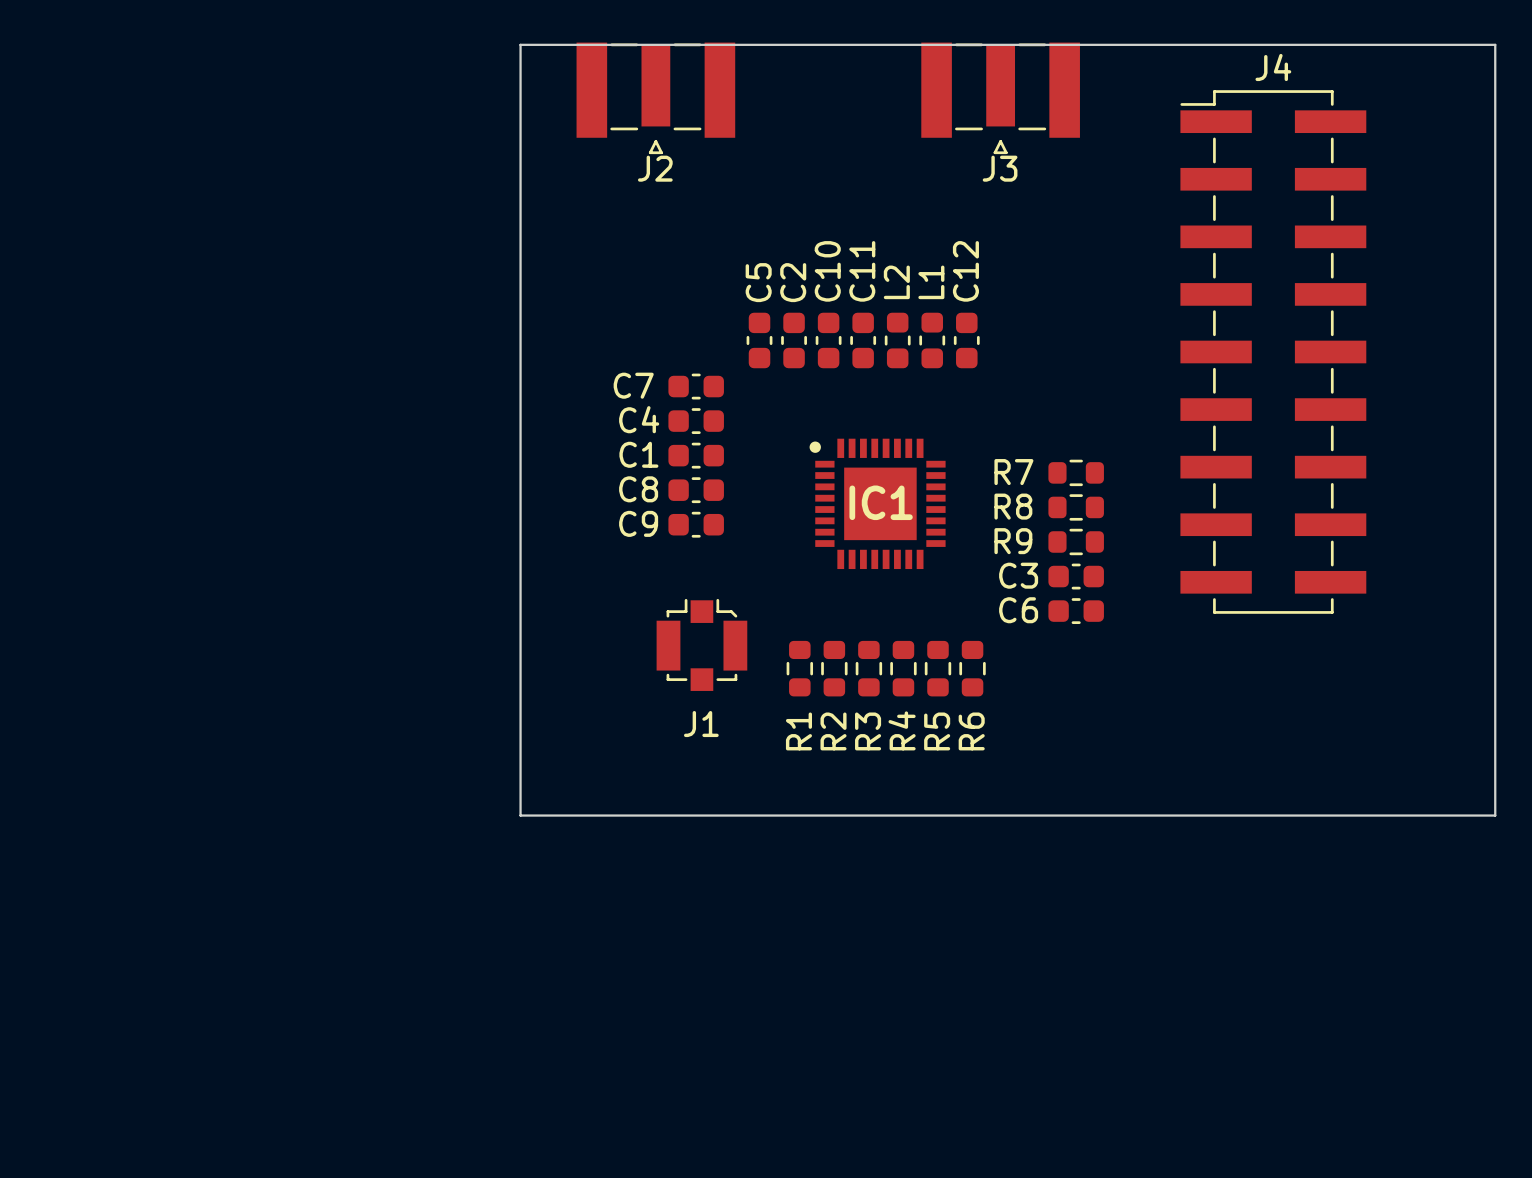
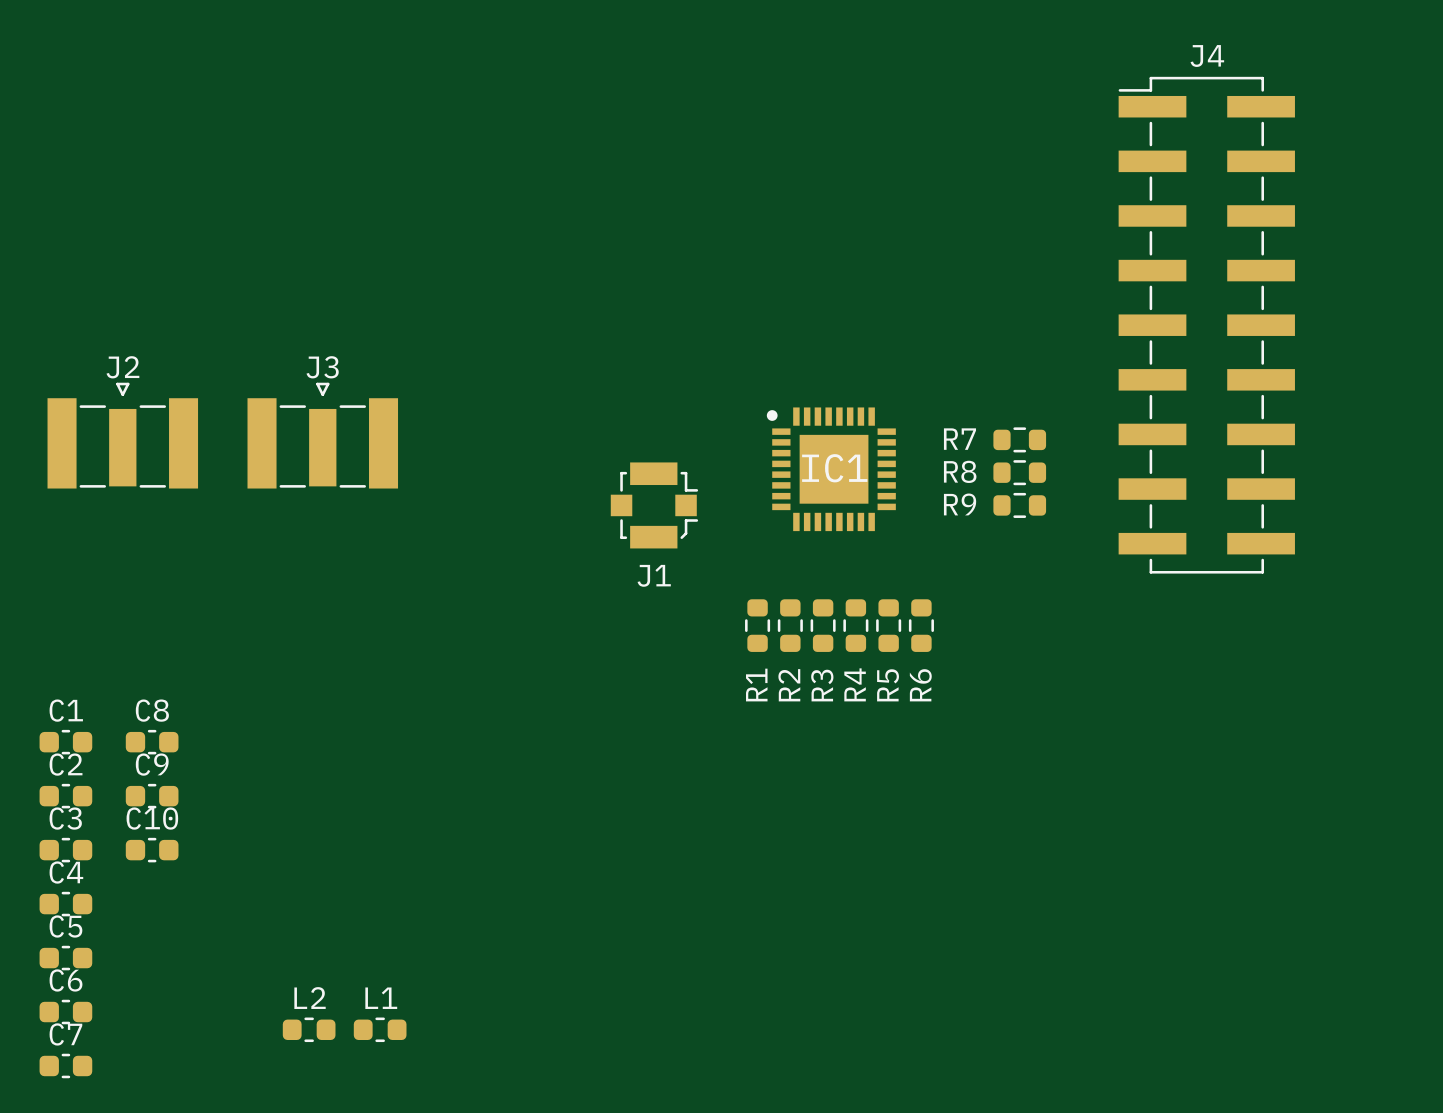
board edge: (520, 44) (1495, 44) (1495, 815) (520, 815) (520, 44) -> none
J2 rotation: 0° (655, 98) -> 180° (122, 435)
J2 position: (655, 98) -> (122, 435)
J3 rotation: 0° (1000, 98) -> 180° (322, 435)
J3 position: (1000, 98) -> (322, 435)
C5 rotation: 0° (759, 340) -> 90° clockwise (65, 958)
C5 position: (759, 340) -> (65, 958)
C2 rotation: 0° (794, 340) -> 90° clockwise (65, 796)
C2 position: (794, 340) -> (65, 796)
C10 rotation: 0° (828, 340) -> 90° clockwise (152, 850)
C10 position: (828, 340) -> (152, 850)
C11: (863, 340) -> none
L2 rotation: 0° (897, 340) -> 90° clockwise (309, 1029)
L2 position: (897, 340) -> (309, 1029)
L1 rotation: 0° (932, 340) -> 90° clockwise (380, 1029)
L1 position: (932, 340) -> (380, 1029)
C12: (966, 340) -> none
C7 name position: C7 (633, 385) -> C7 (65, 1034)
C7 position: (696, 386) -> (65, 1065)
C4 name position: C4 (639, 419) -> C4 (66, 872)
C4 position: (696, 421) -> (65, 904)
C1 name position: C1 (638, 454) -> C1 (66, 710)
C1 position: (696, 455) -> (65, 742)
C8 name position: C8 (638, 489) -> C8 (152, 710)
C8 position: (696, 490) -> (152, 742)
C9 name position: C9 (638, 523) -> C9 (152, 764)
C9 position: (696, 524) -> (152, 796)
C3 name position: C3 (1018, 575) -> C3 (65, 818)
C3 position: (1076, 576) -> (65, 850)
C6 name position: C6 (1018, 610) -> C6 (66, 980)
C6 position: (1076, 611) -> (65, 1012)
J1 rotation: 0° (701, 644) -> 90° clockwise (654, 505)
J1 position: (701, 644) -> (654, 505)

